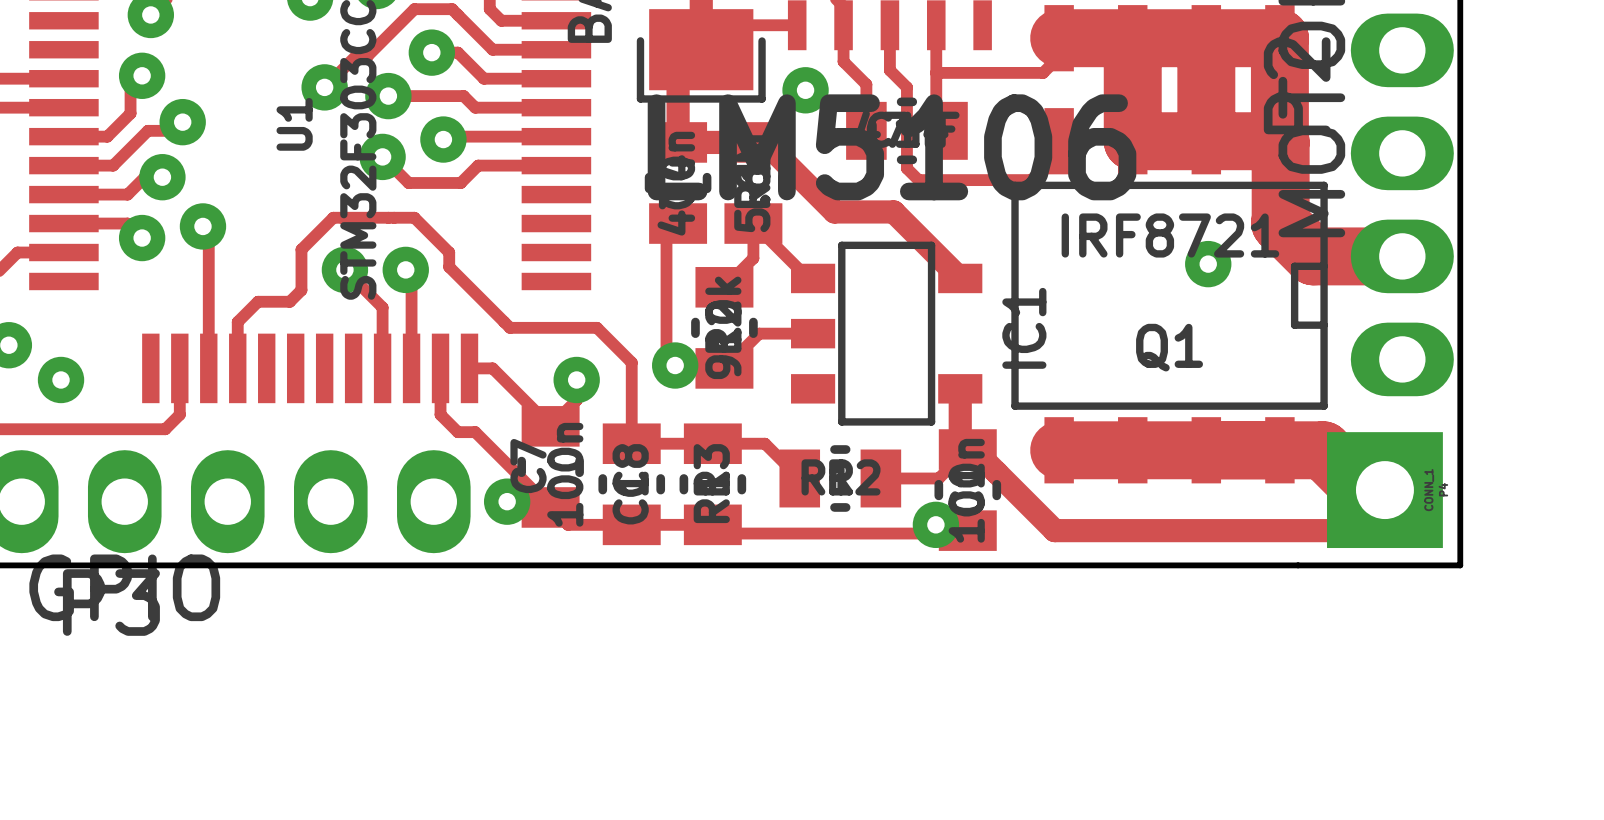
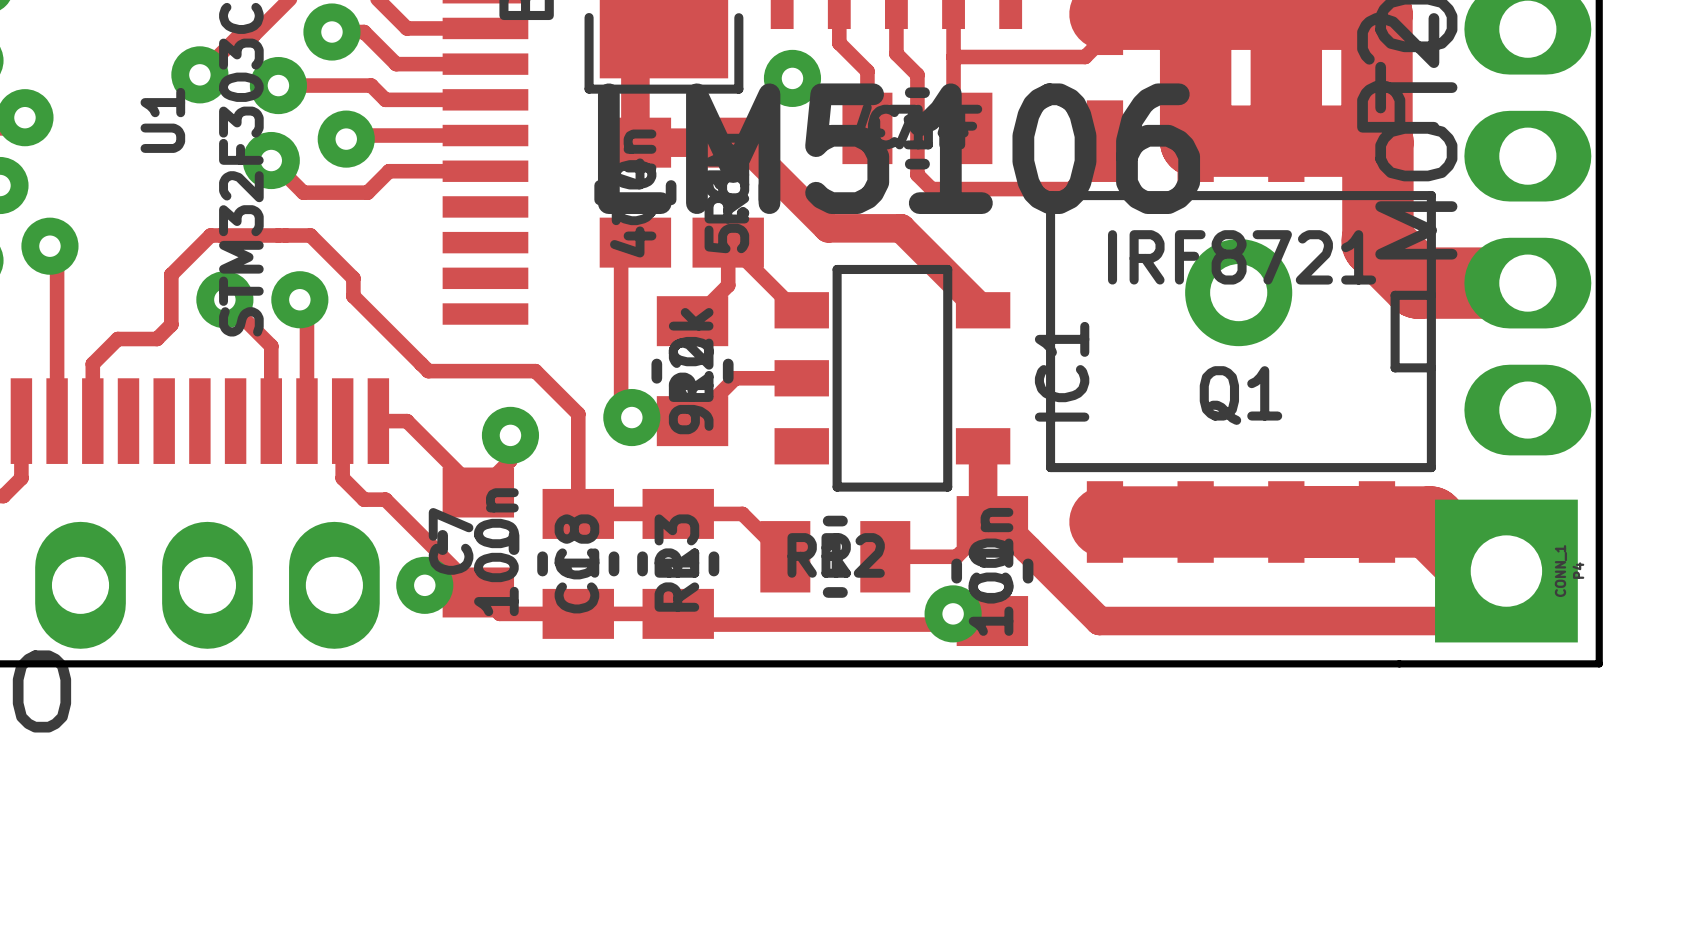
via size: [1185, 240, 1232, 288] -> [1185, 239, 1293, 347]

